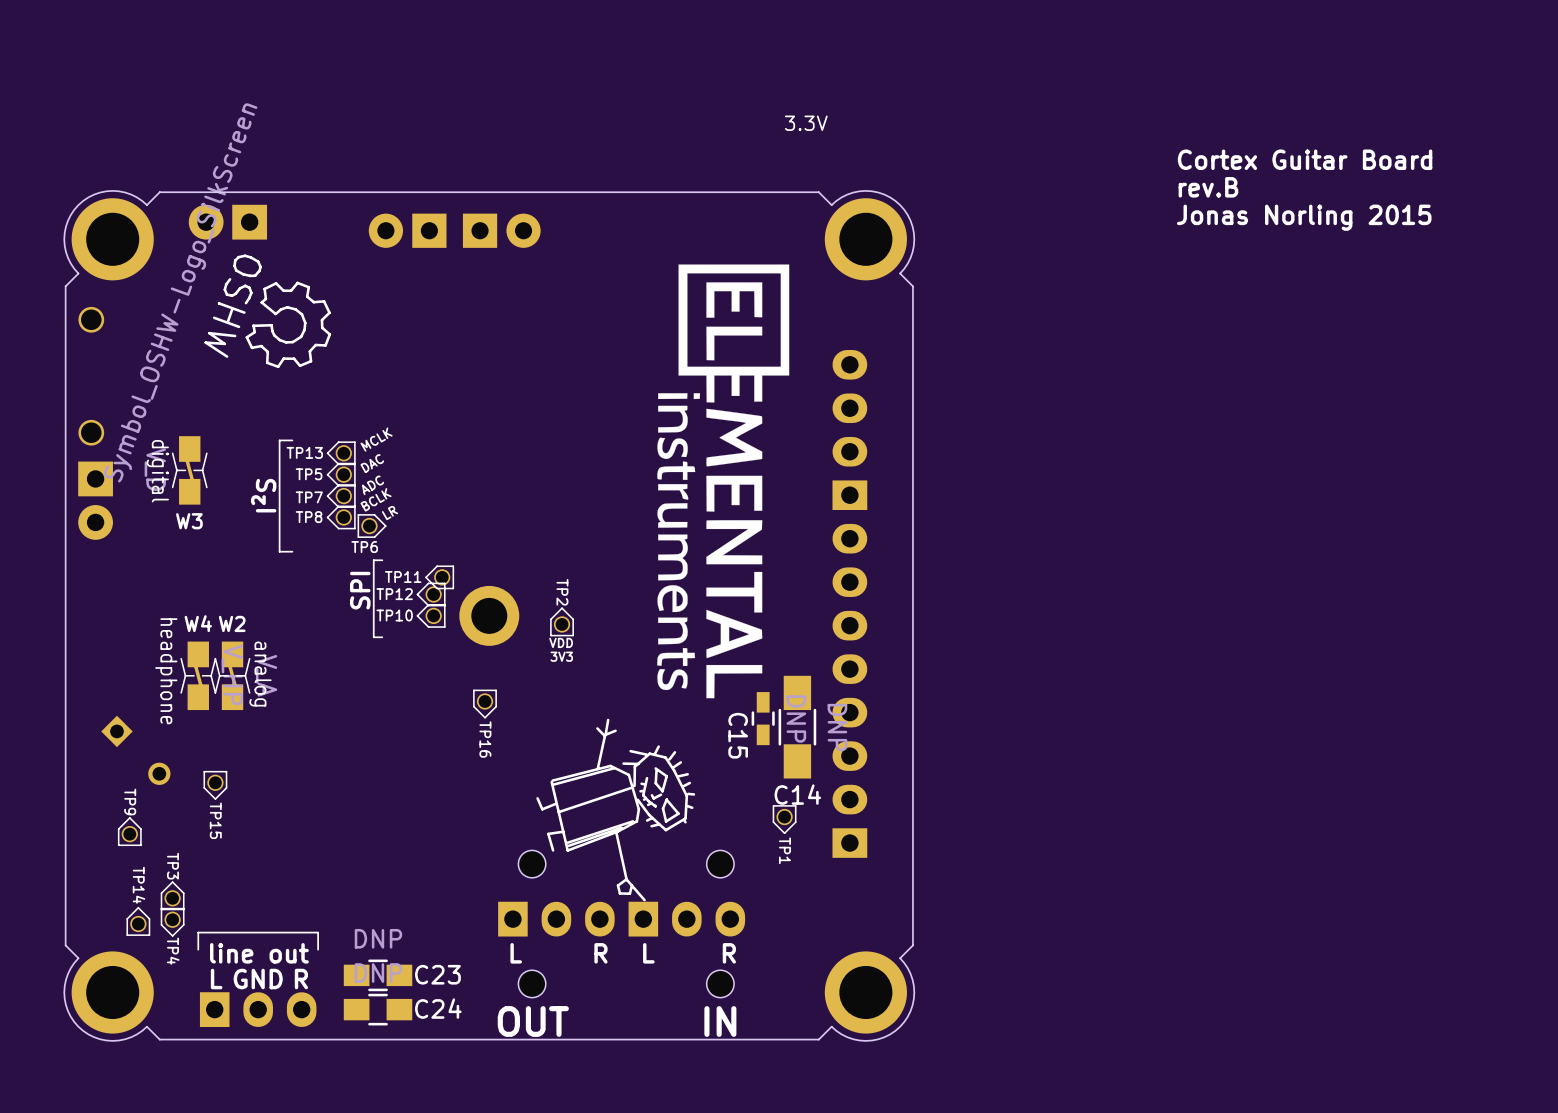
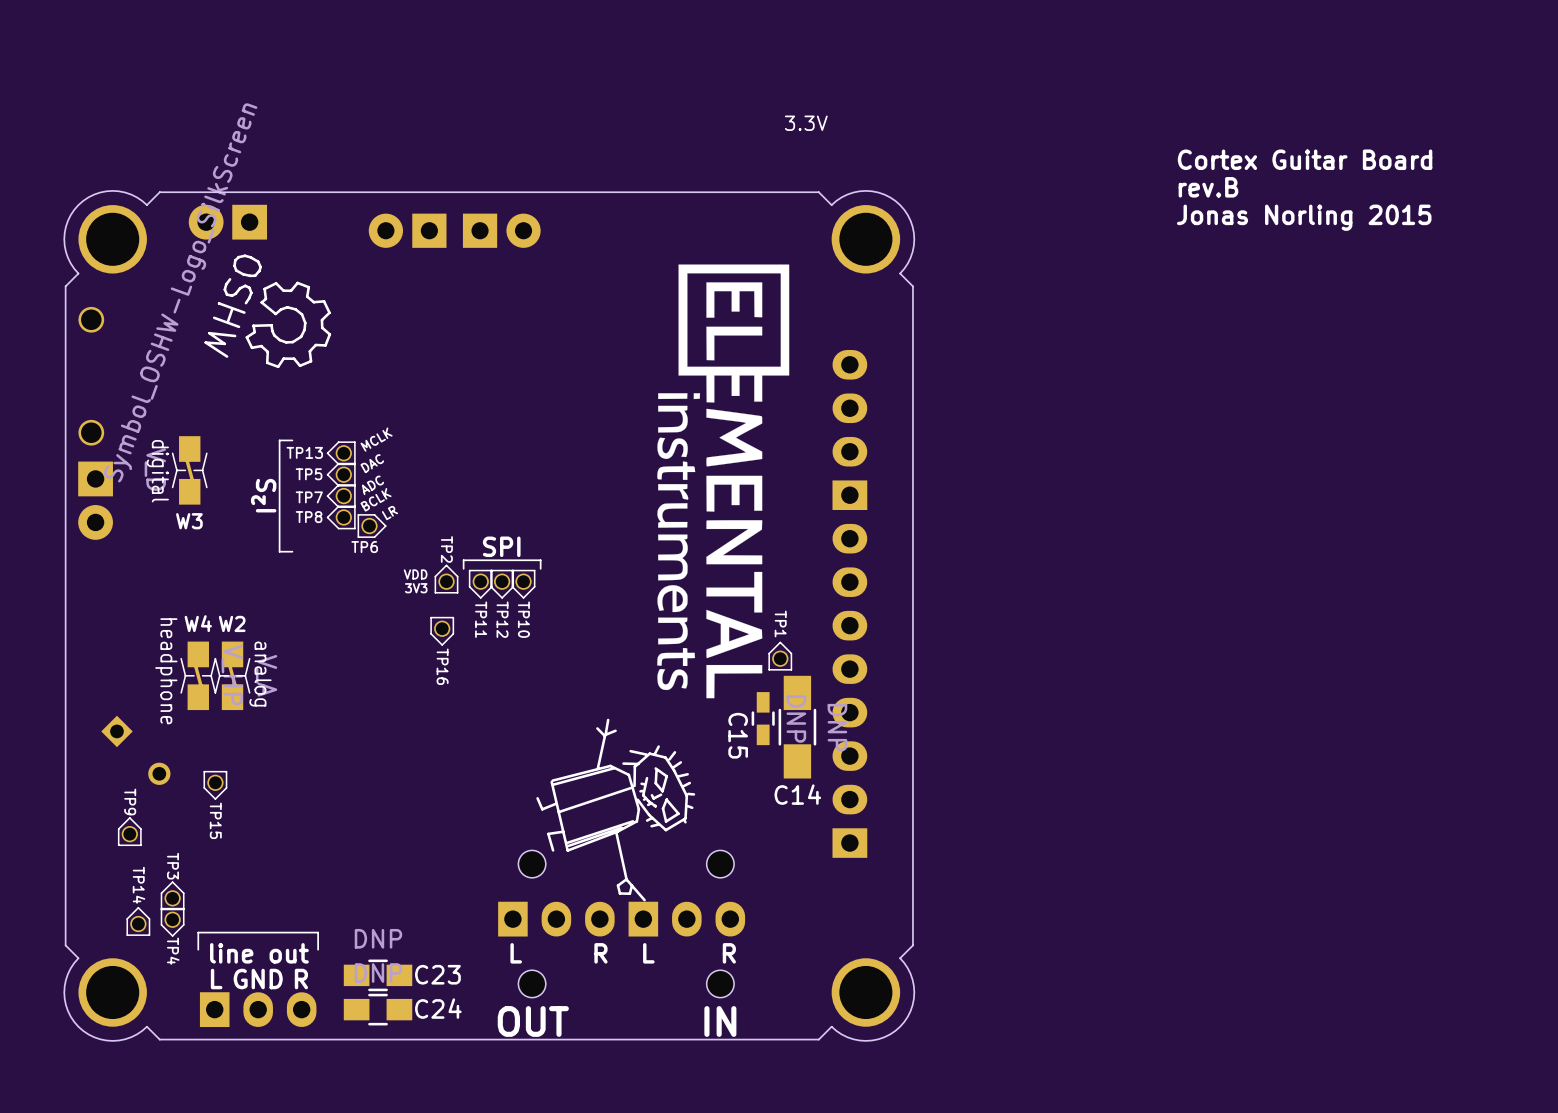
part footprint: [71, 198, 154, 281] -> [78, 205, 147, 274]
part footprint: [824, 198, 907, 281] -> [831, 205, 901, 274]
line: (382, 560) (373, 560) (373, 637) (382, 637) -> none
line: none -> (540, 568) (540, 560) (463, 560) (463, 568)
TP11 rotation: 0° (439, 577) -> 90° counterclockwise (480, 584)
TP11 position: (439, 577) -> (480, 584)
text rotation: 0° (360, 590) -> 90° clockwise (501, 546)
text position: SPI (360, 590) -> SPI (501, 546)
TP12 rotation: 0° (431, 594) -> 90° counterclockwise (502, 584)
TP12 position: (431, 594) -> (502, 584)
TP10 rotation: 0° (431, 615) -> 90° counterclockwise (523, 584)
TP10 position: (431, 615) -> (523, 584)
part: (489, 615) -> none
TP2 position: (562, 621) -> (446, 579)
text position: VDD (561, 642) -> VDD (415, 574)
text position: 3V3 (561, 656) -> 3V3 (416, 588)
TP16 position: (485, 704) -> (442, 631)
TP1 rotation: 0° (784, 819) -> 180° (780, 656)
TP1 position: (784, 819) -> (780, 656)
part footprint: [71, 951, 154, 1034] -> [78, 958, 147, 1027]
part footprint: [824, 951, 907, 1034] -> [831, 958, 901, 1027]

